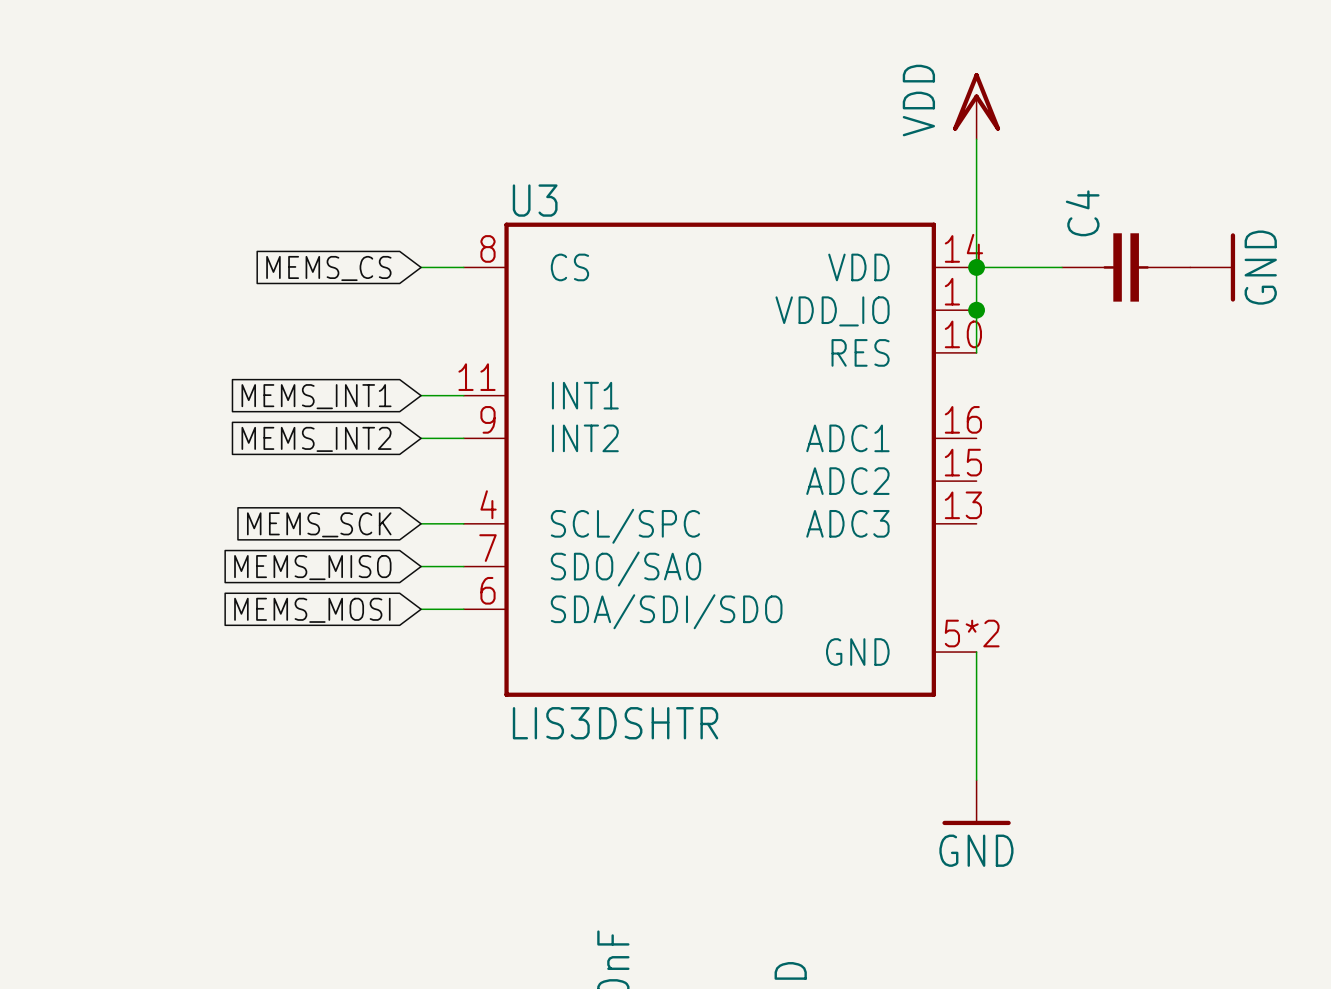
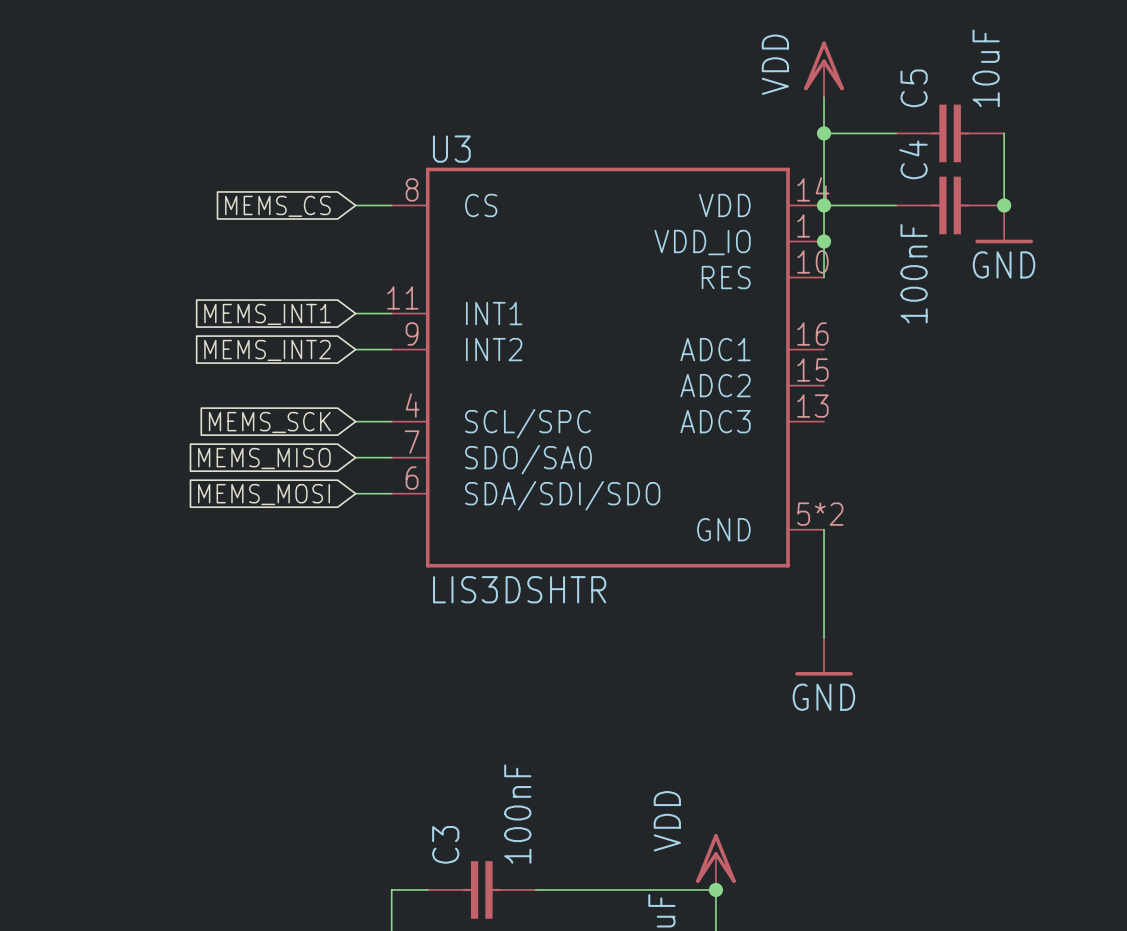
wire: none -> (824, 133) (896, 133)
junction: none -> (824, 133)
C5: none -> 10uF (950, 133)
wire: none -> (1004, 133) (1004, 205)
junction: none -> (1004, 205)
power symbol rotation: 0° (1232, 267) -> 90° clockwise (1004, 241)
C4 value: none -> 100nF (914, 273)

